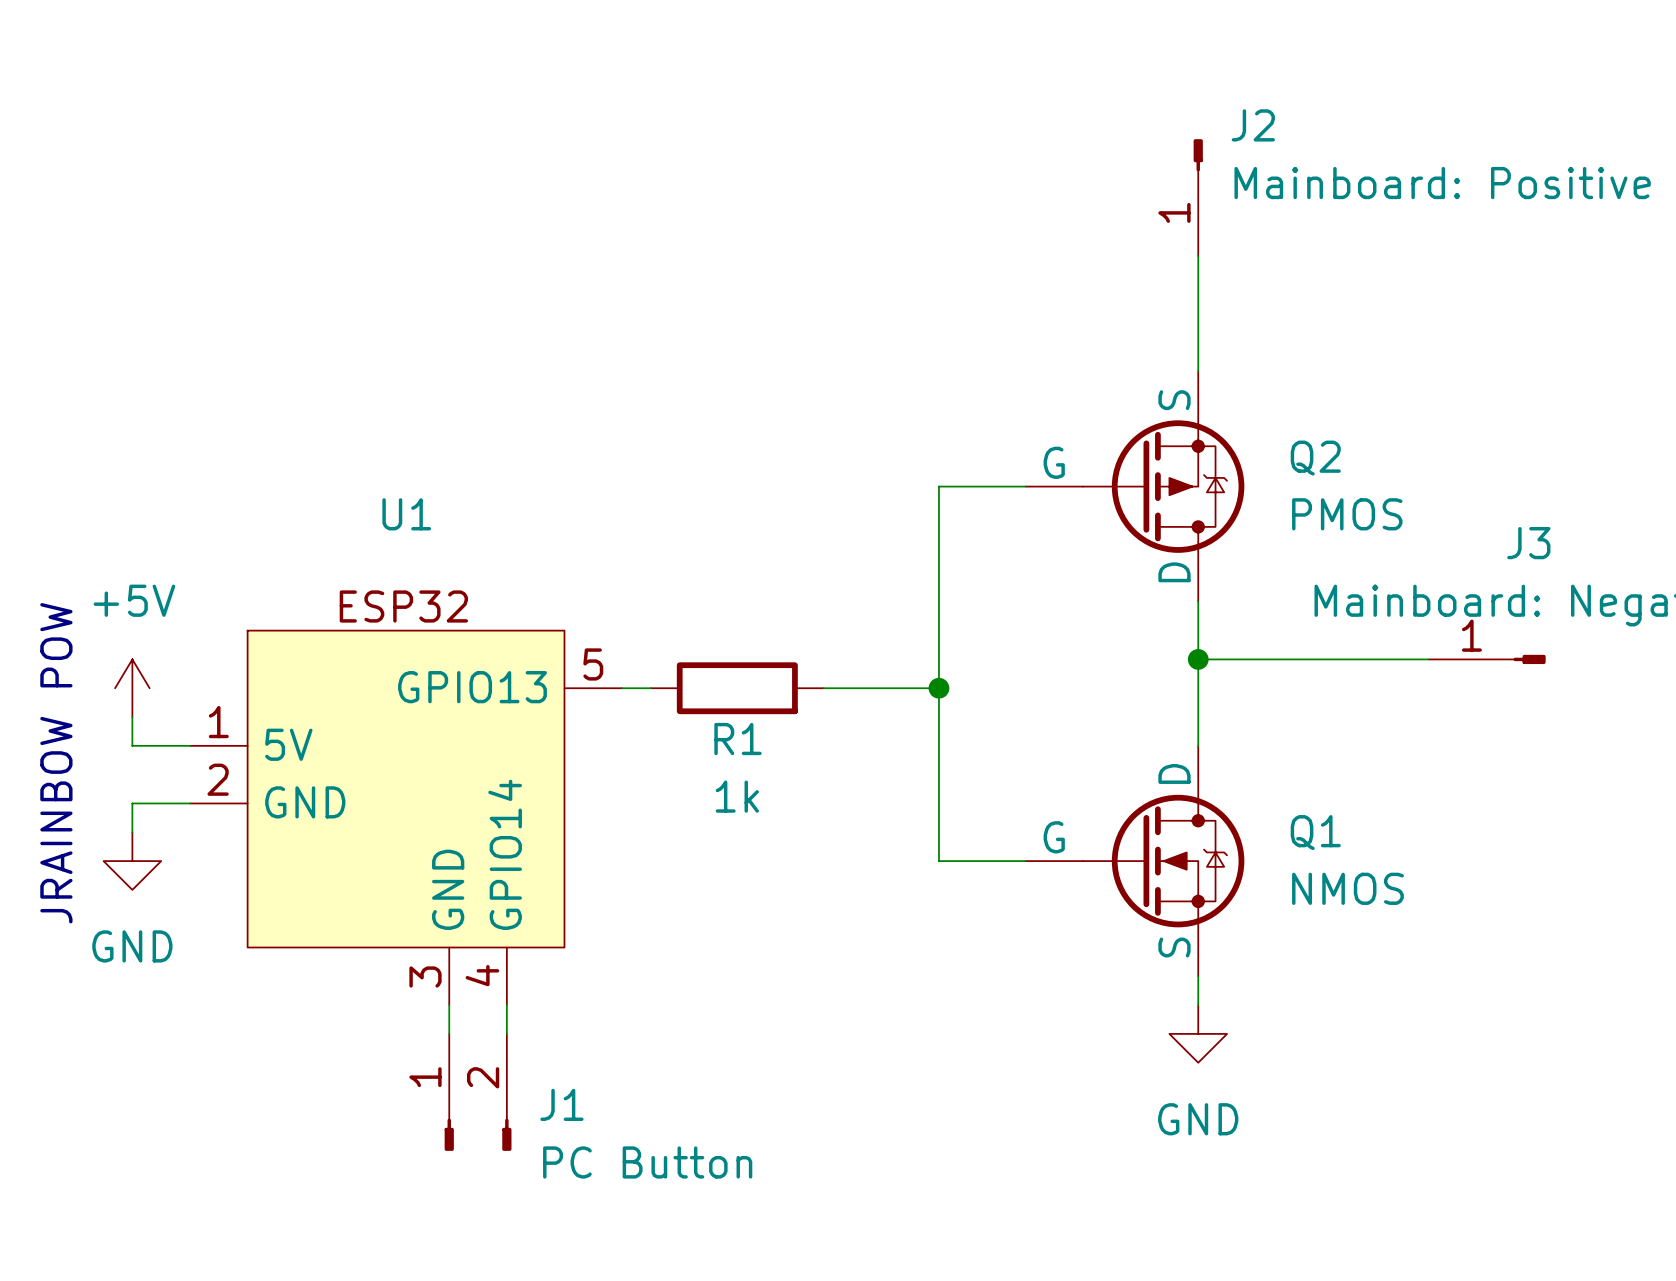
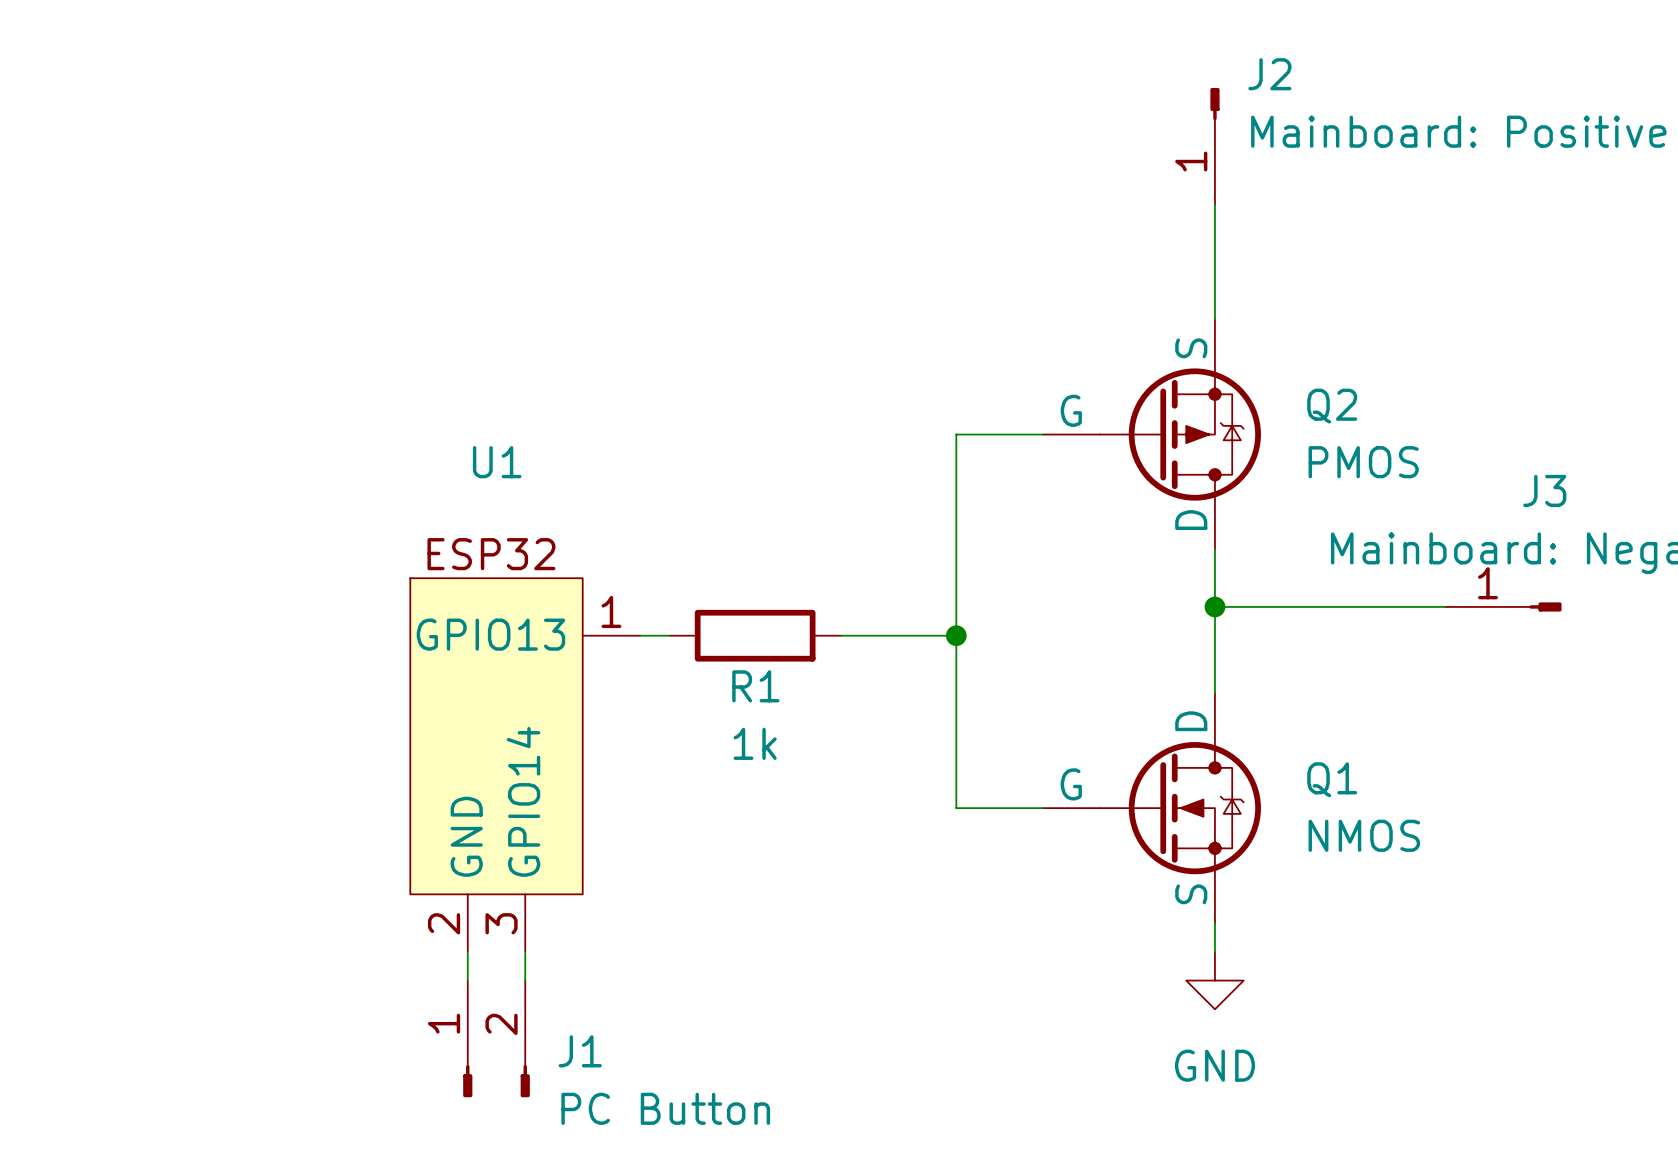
U1 symbol: [189, 630, 623, 1006] -> [410, 578, 641, 952]
power symbol: +5V (132, 688) -> none
wire: (132, 717) (132, 745) (189, 745) -> none
text: JRAINBOW POW (56, 763) -> none
wire: (189, 803) (132, 803) (132, 832) -> none
power symbol: GND (132, 861) -> none

